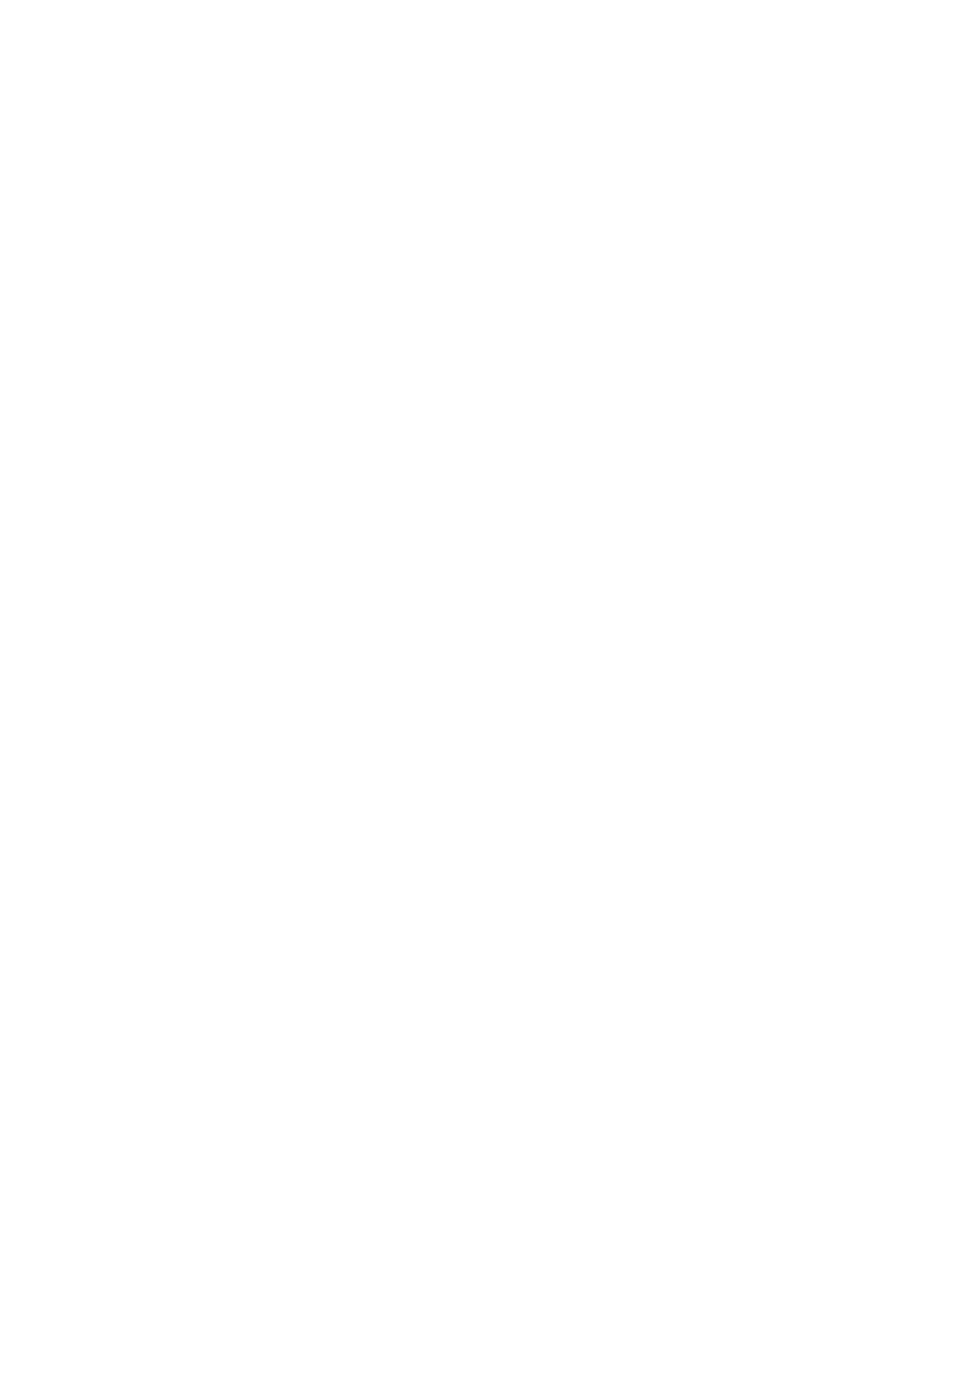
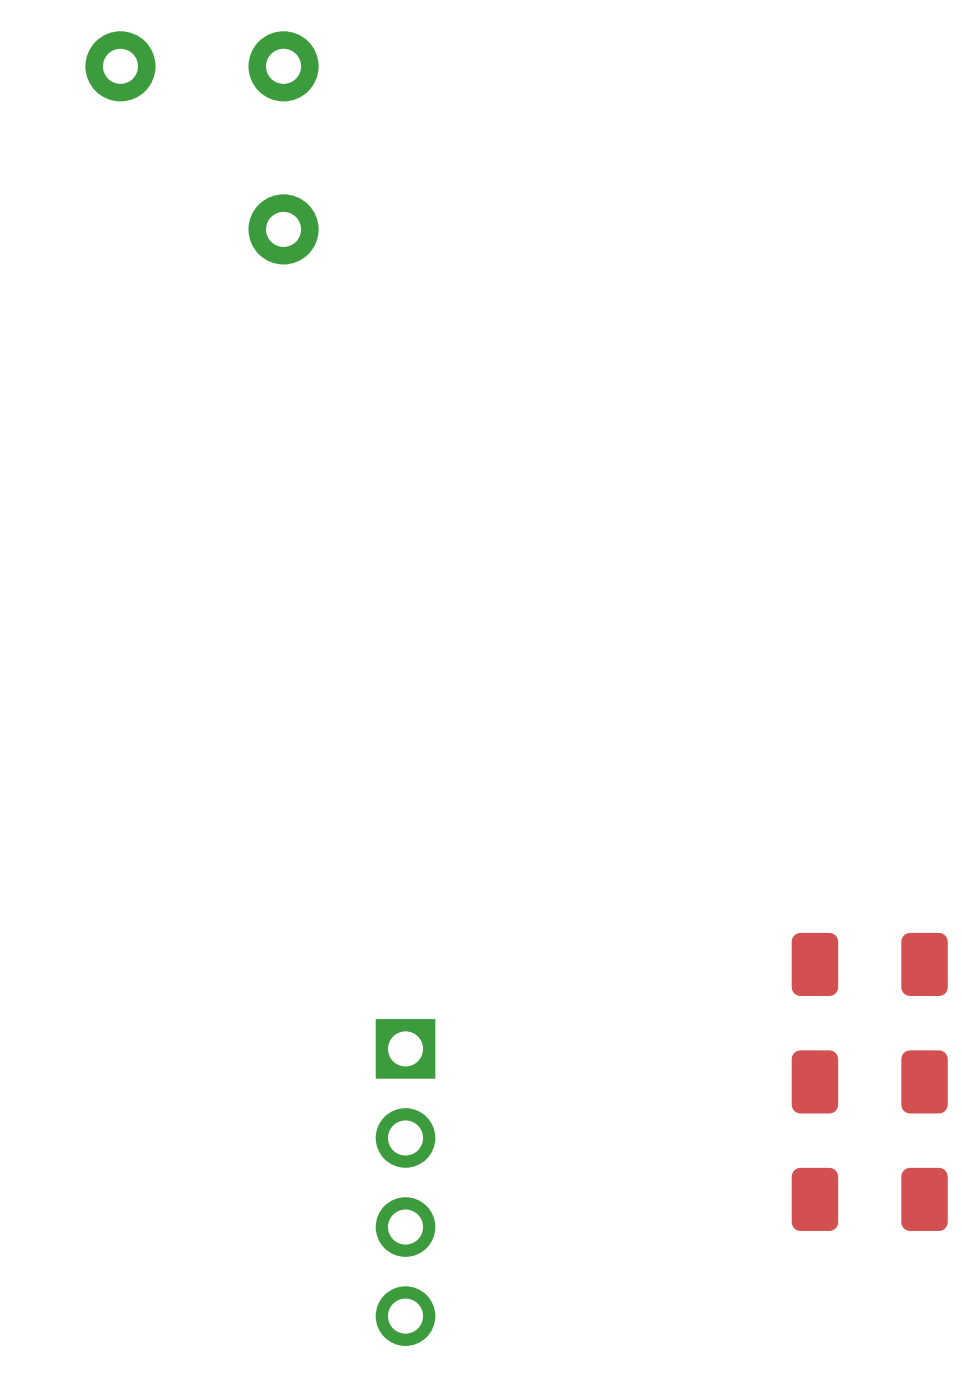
part: none -> (120, 66)
part: none -> (283, 66)
part: none -> (283, 229)
part: none -> (869, 964)
part: none -> (869, 1081)
part: none -> (405, 1182)
part: none -> (869, 1199)

